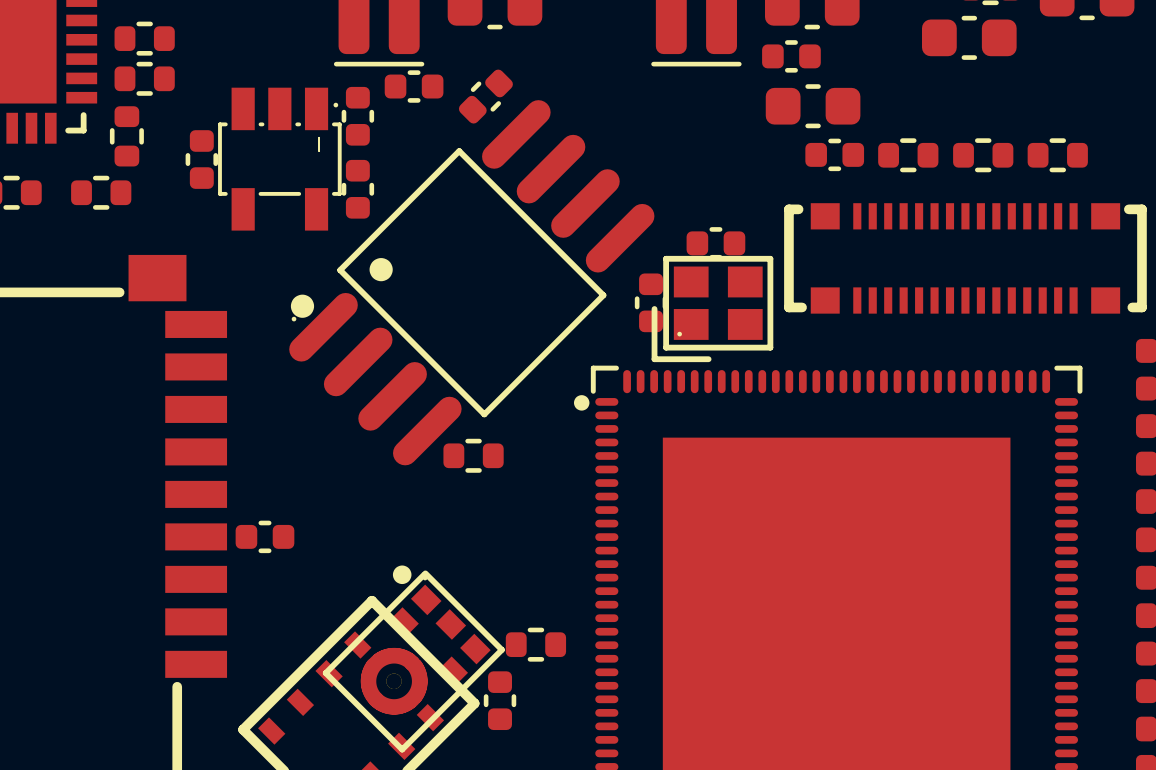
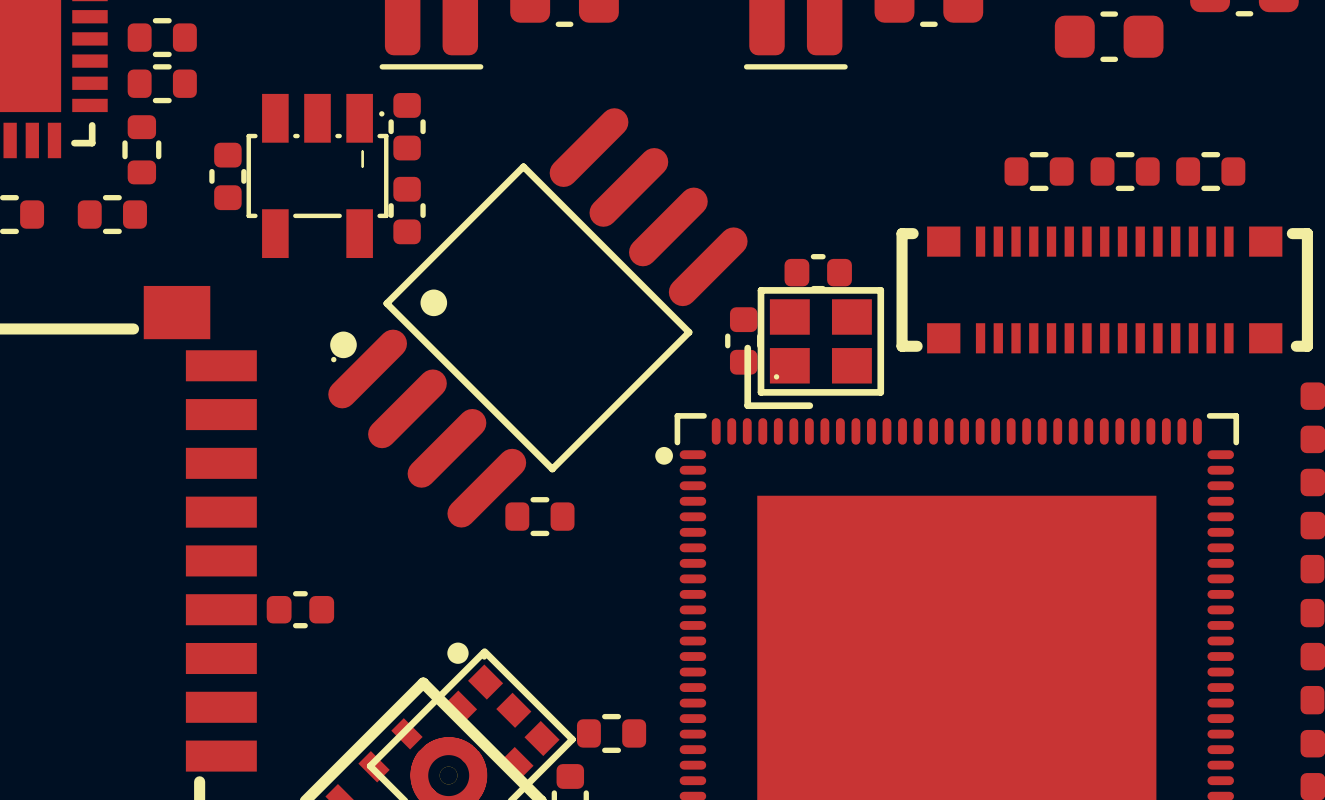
part: (791, 56) -> none
part: (414, 86) -> none
part: (485, 96) -> none
part: (813, 106) -> none
part: (834, 154) -> none

